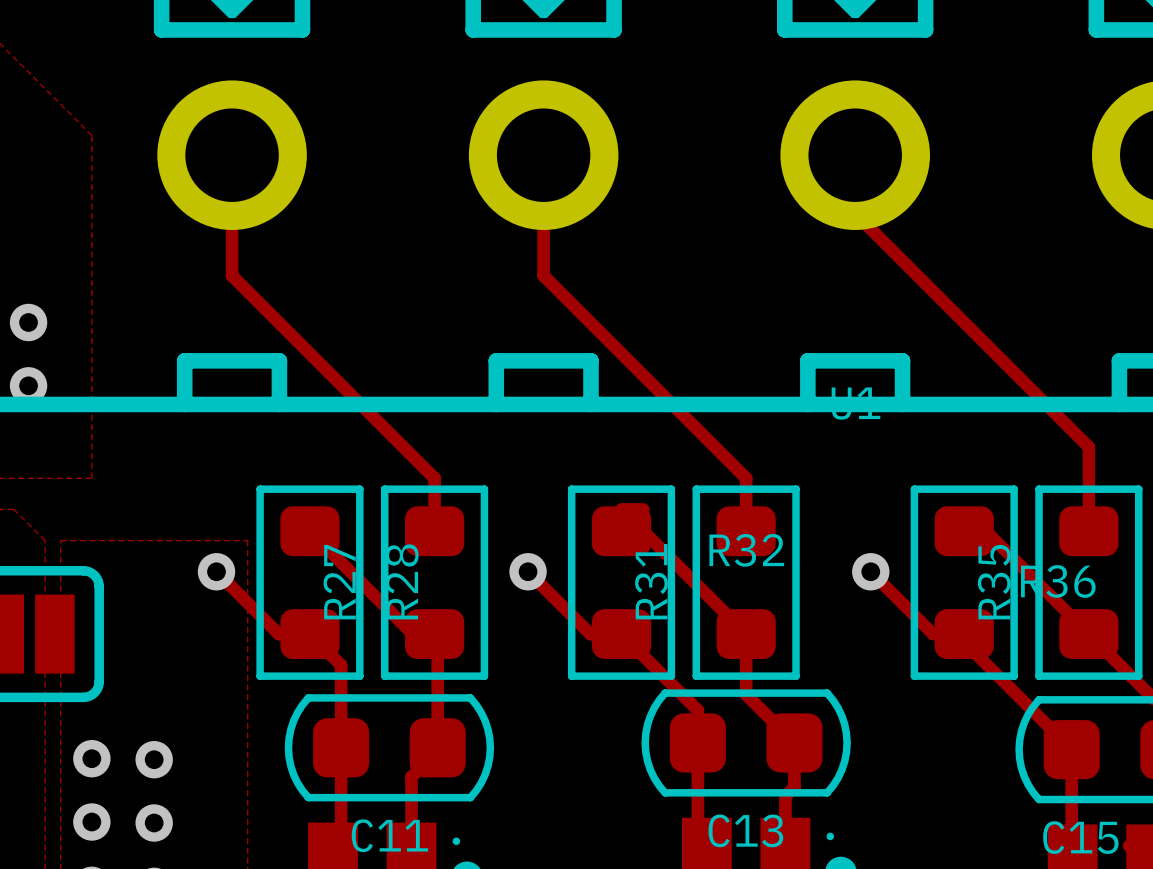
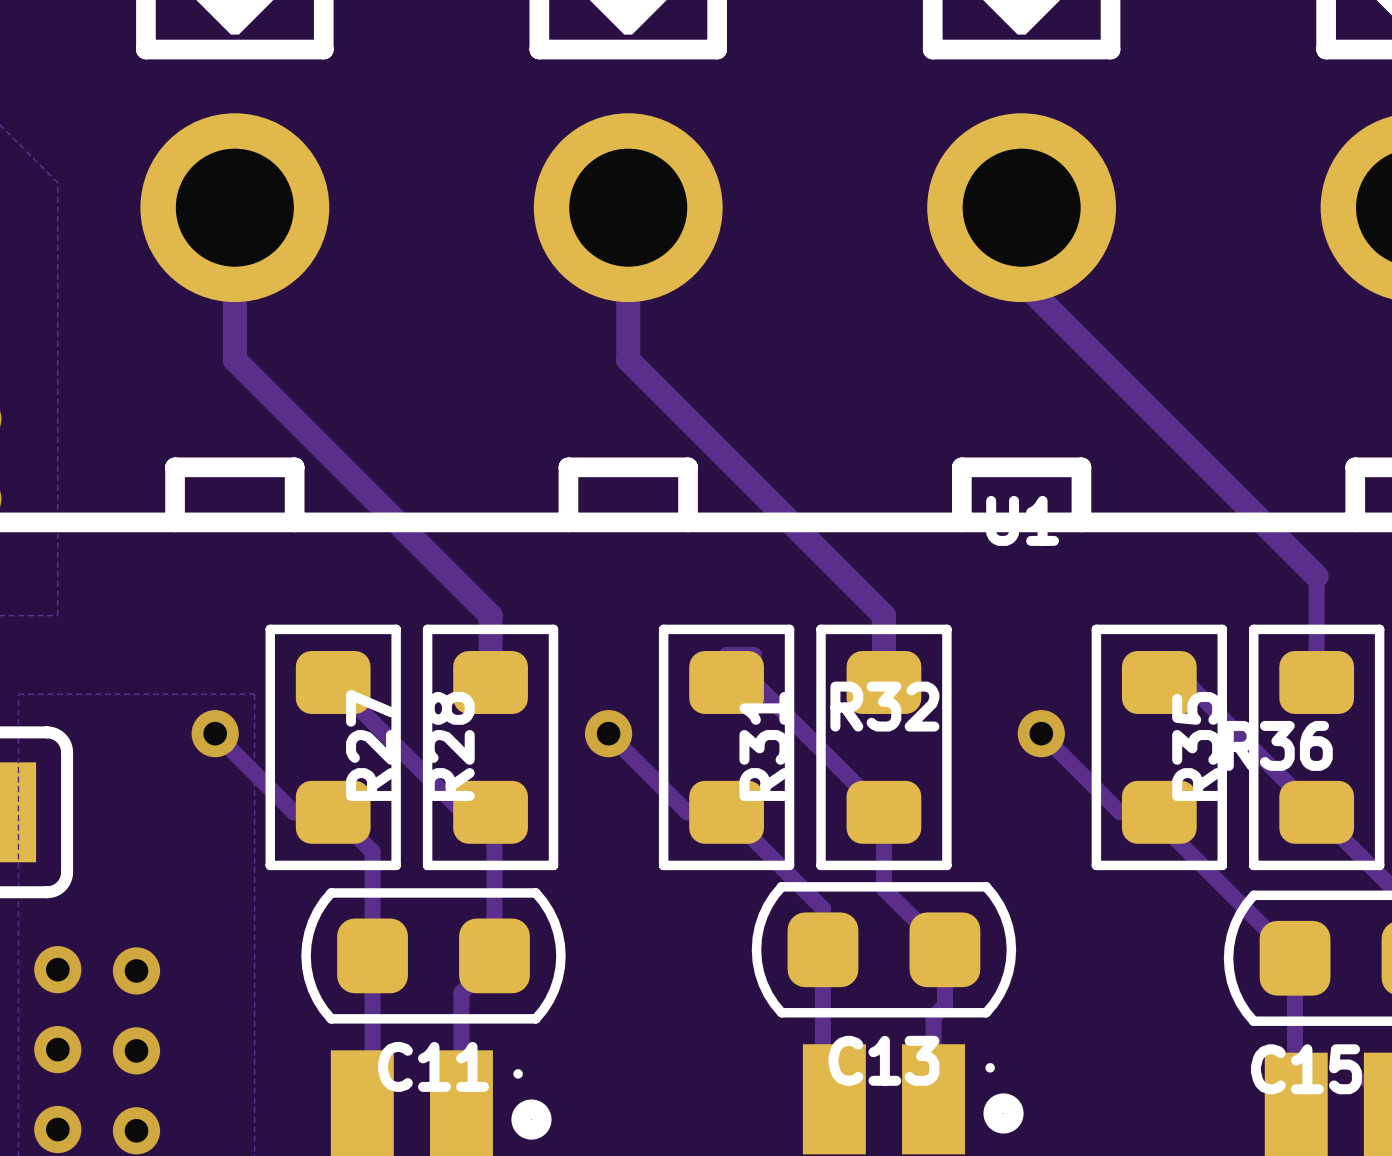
track width: thin (232, 155) (232, 275) (434, 478) (434, 531) -> thick (234, 207) (234, 359) (490, 615) (490, 682)
track width: thin (543, 155) (543, 275) (746, 478) (746, 531) -> thick (628, 207) (628, 359) (883, 615) (883, 682)
track width: thin (855, 155) (855, 213) (1088, 447) (1088, 531) -> thick (1021, 207) (1021, 281) (1316, 576) (1316, 682)

